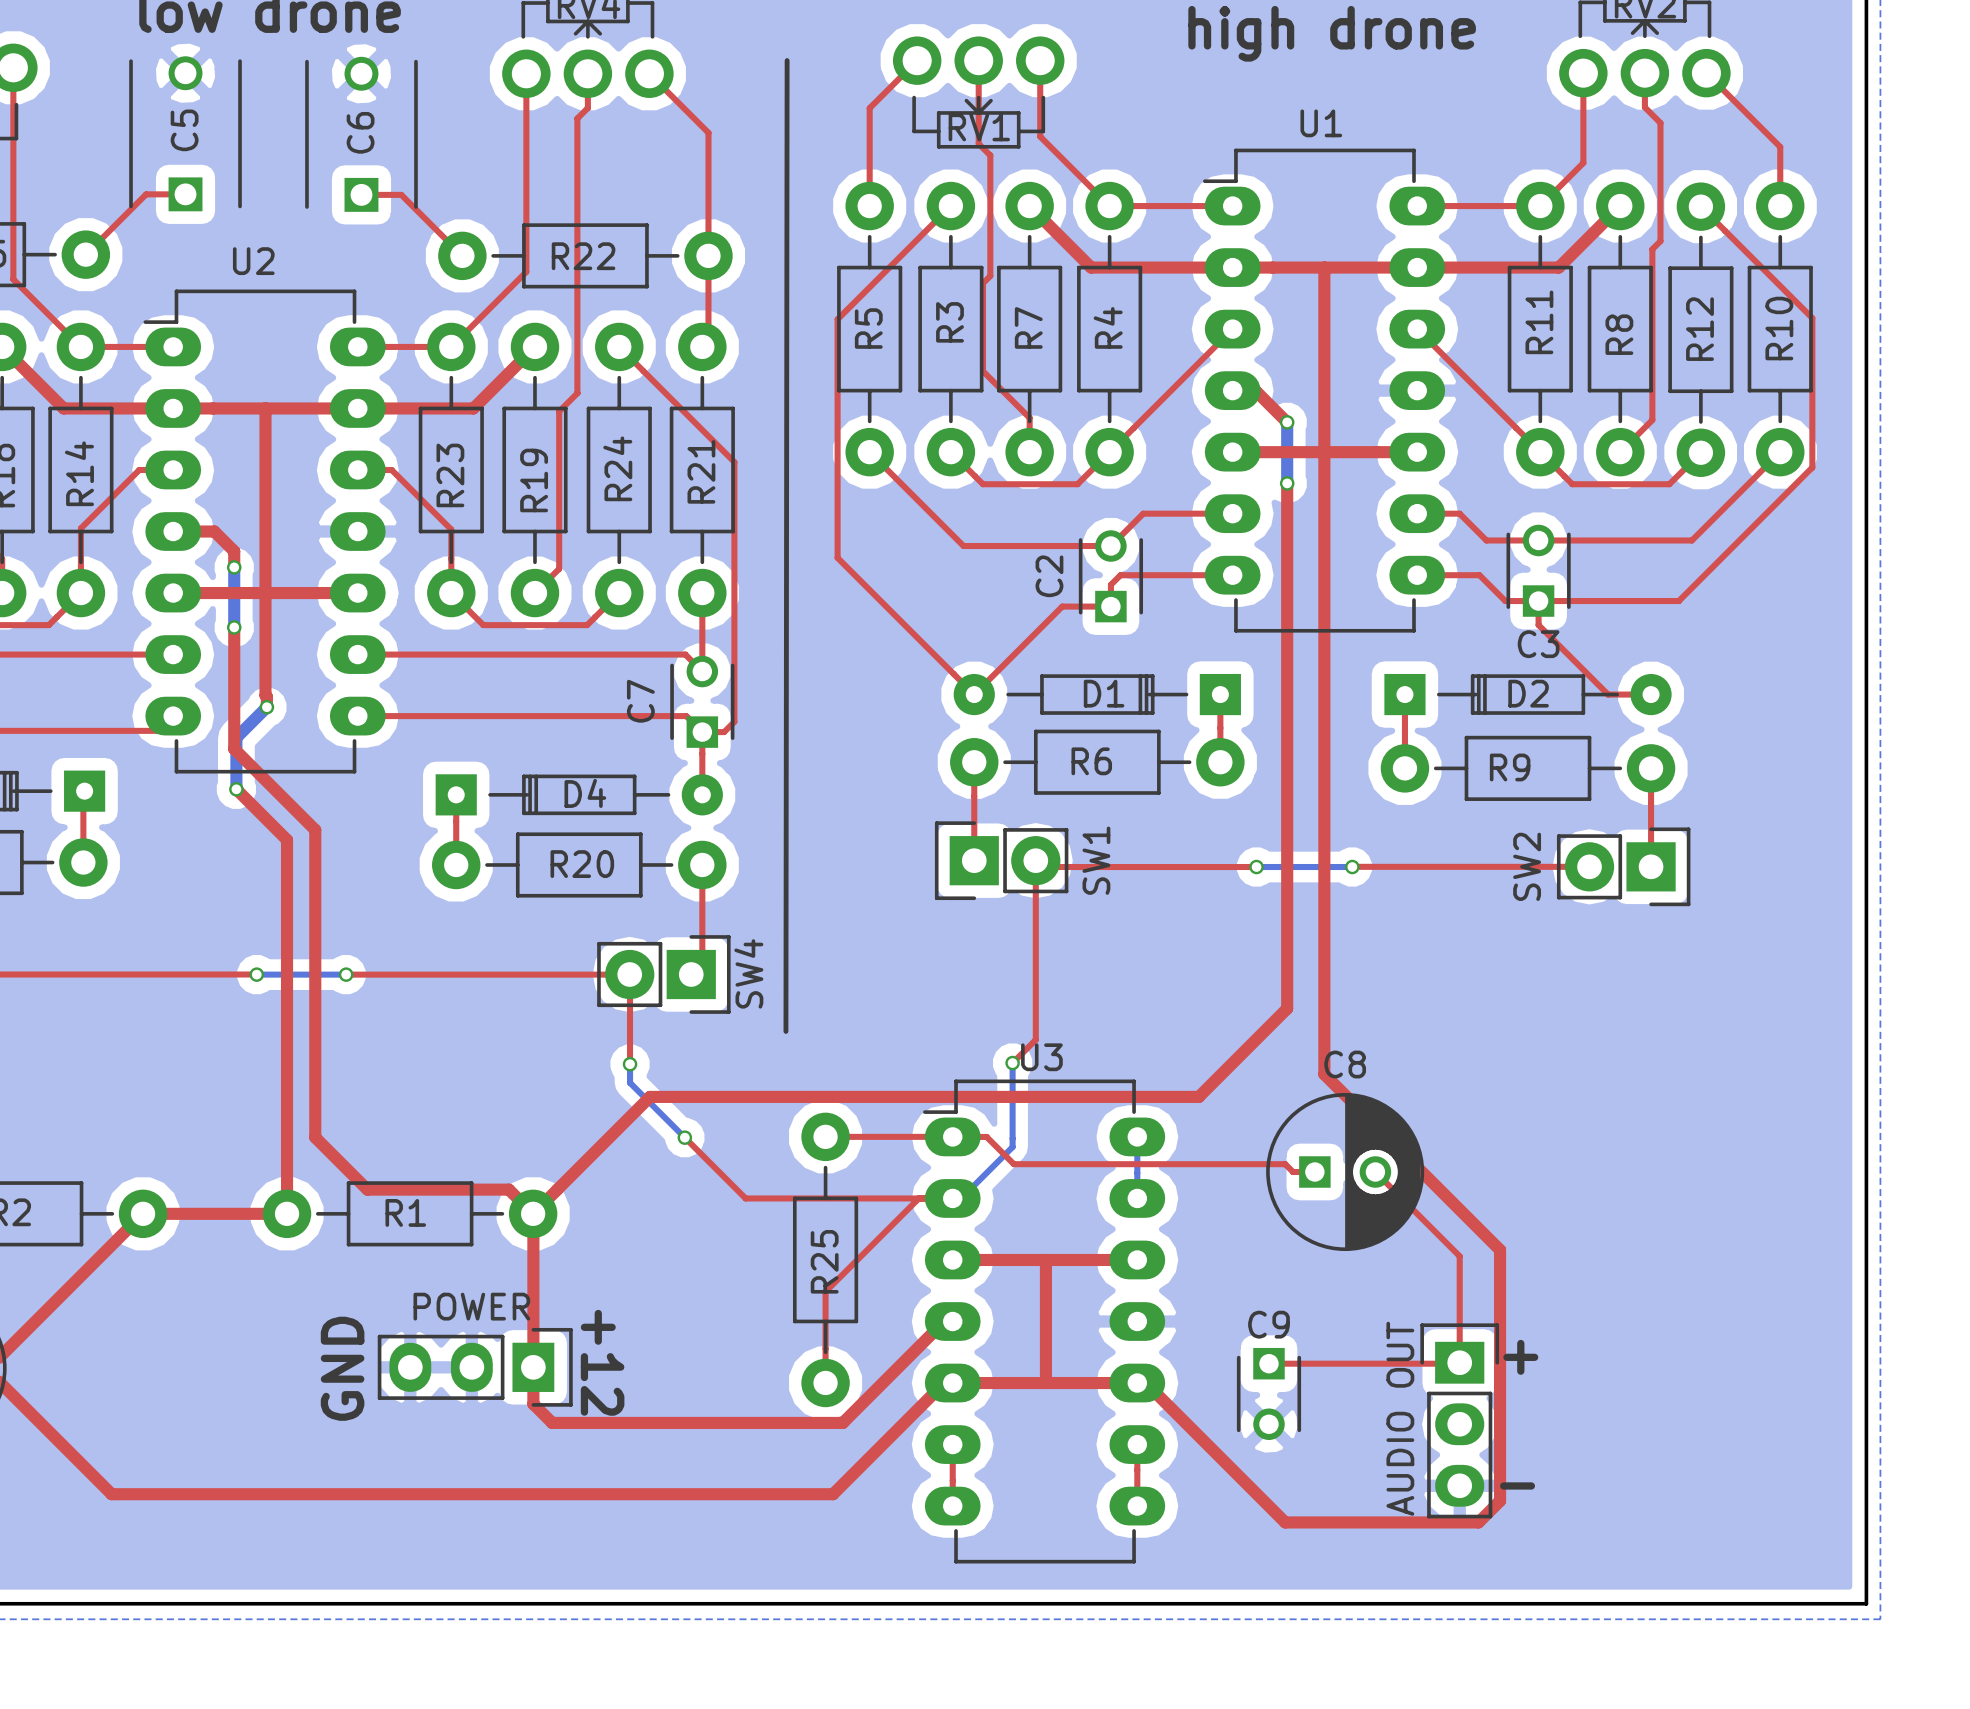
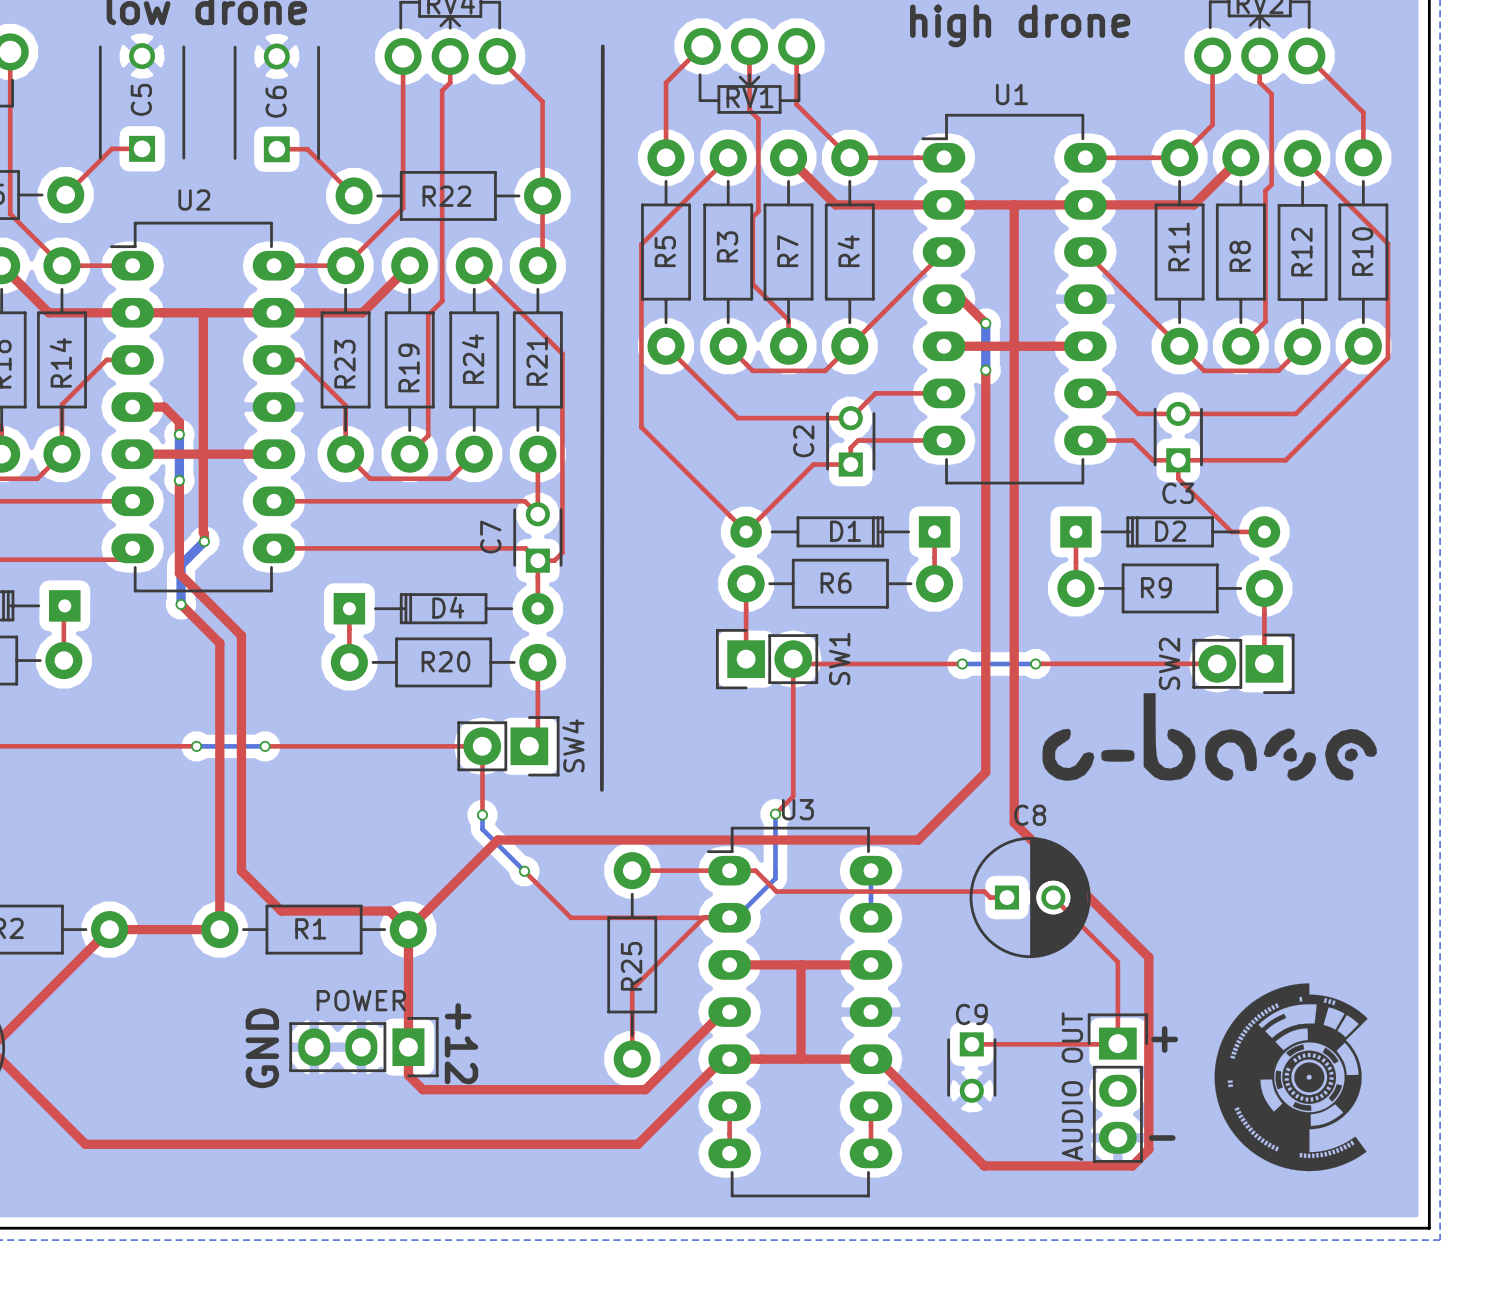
drawing: none -> [1042, 693, 1377, 781]
drawing: none -> [1214, 983, 1368, 1172]

